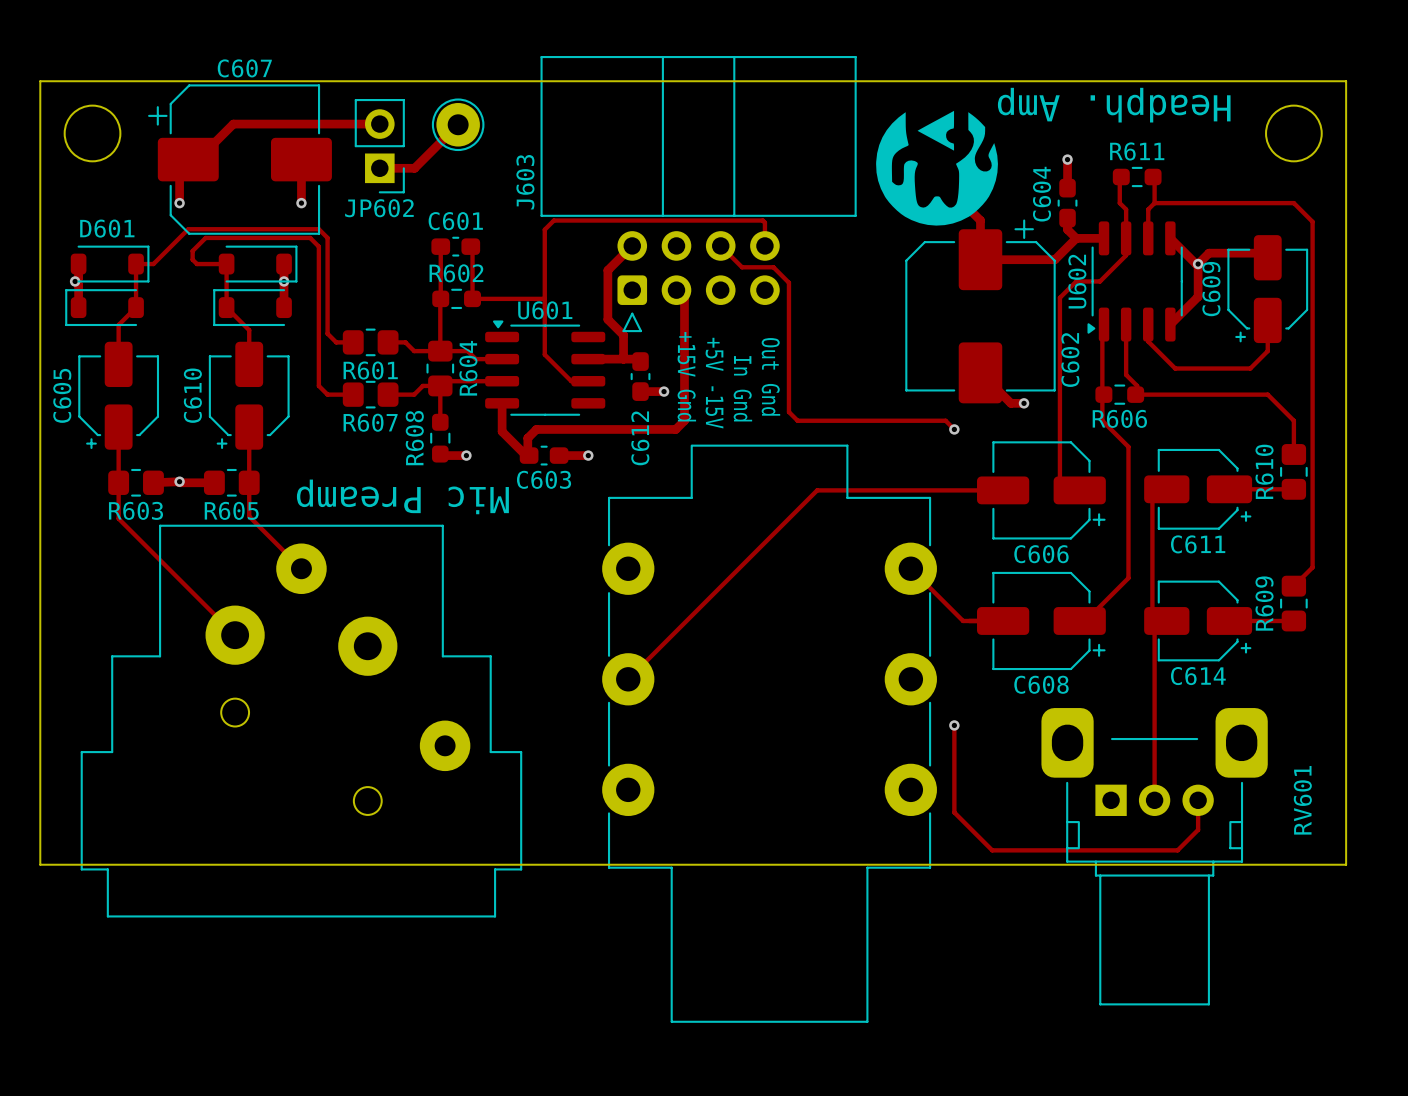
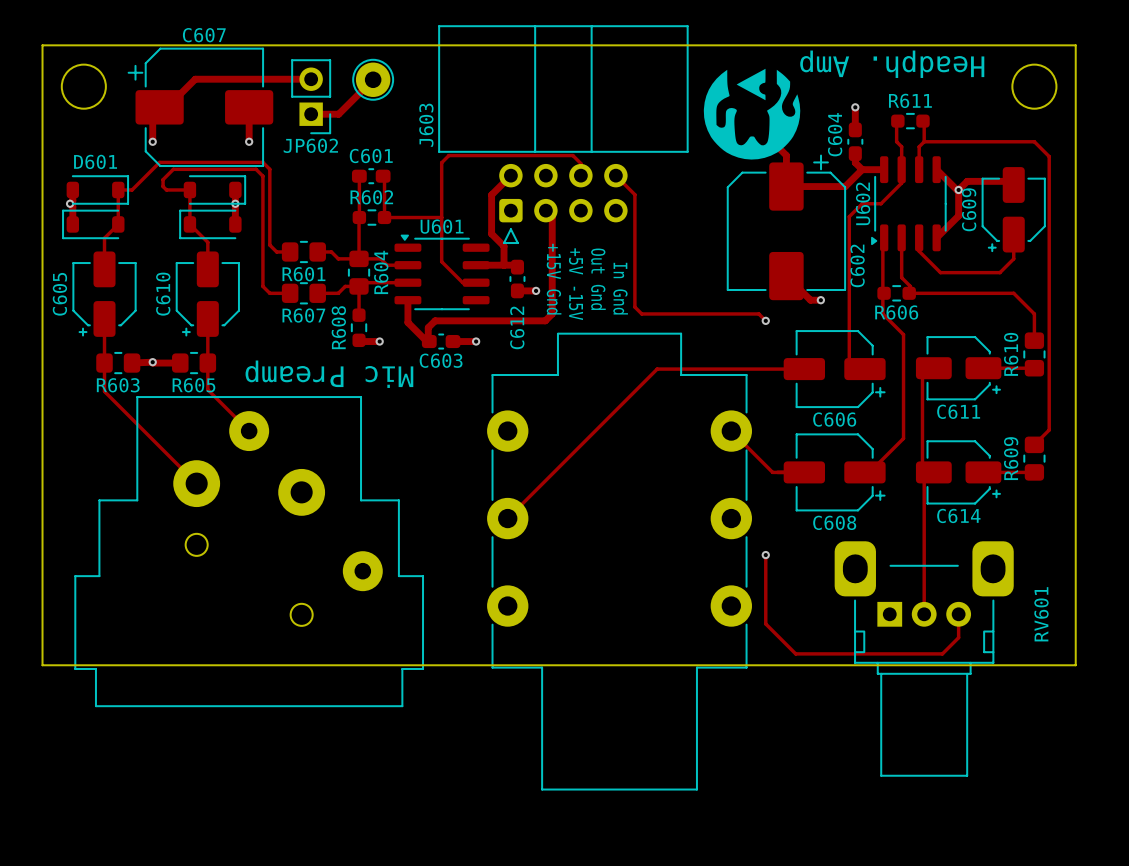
track: (710, 220) (762, 220) (764, 222) (764, 245) -> (572, 155) (580, 163) (580, 175)
track: (720, 245) (742, 267) (773, 267) (788, 282) -> (615, 175) (634, 194) (634, 204)
text: Out Gnd (770, 376) -> In Gnd (620, 288)
text: In Gnd (742, 388) -> Out Gnd (598, 279)

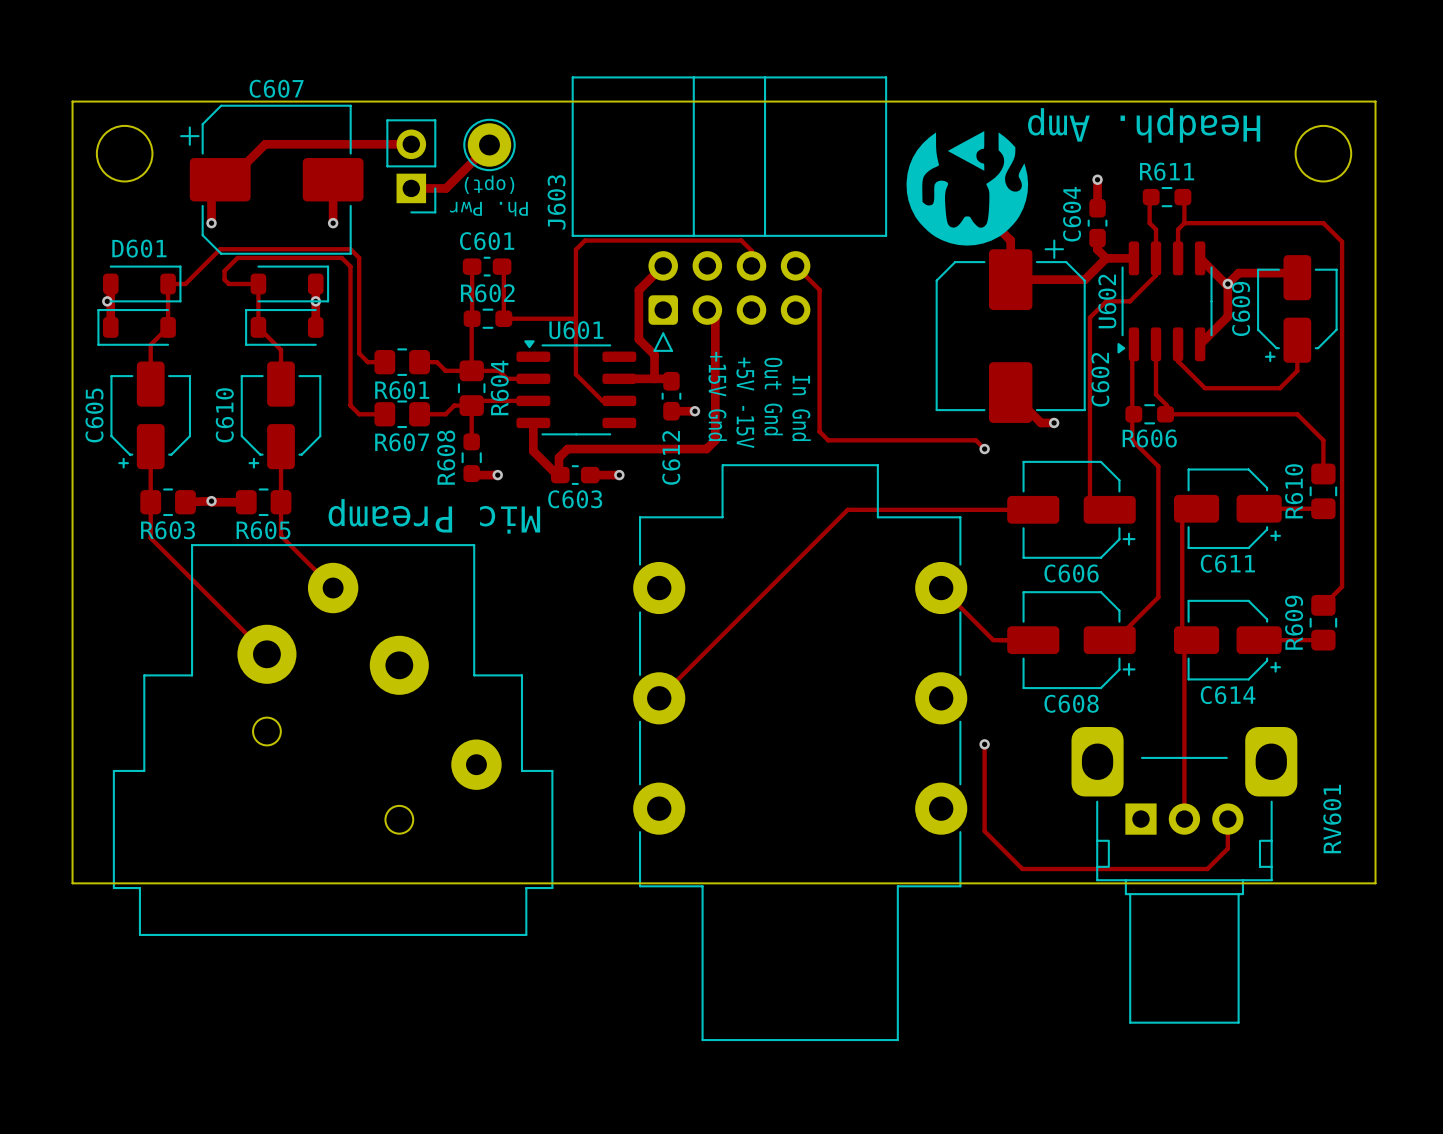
text: none -> (opt) (489, 184)
text: none -> Ph. Pwr (488, 209)
JP602 name: JP602 (310, 145) -> none

